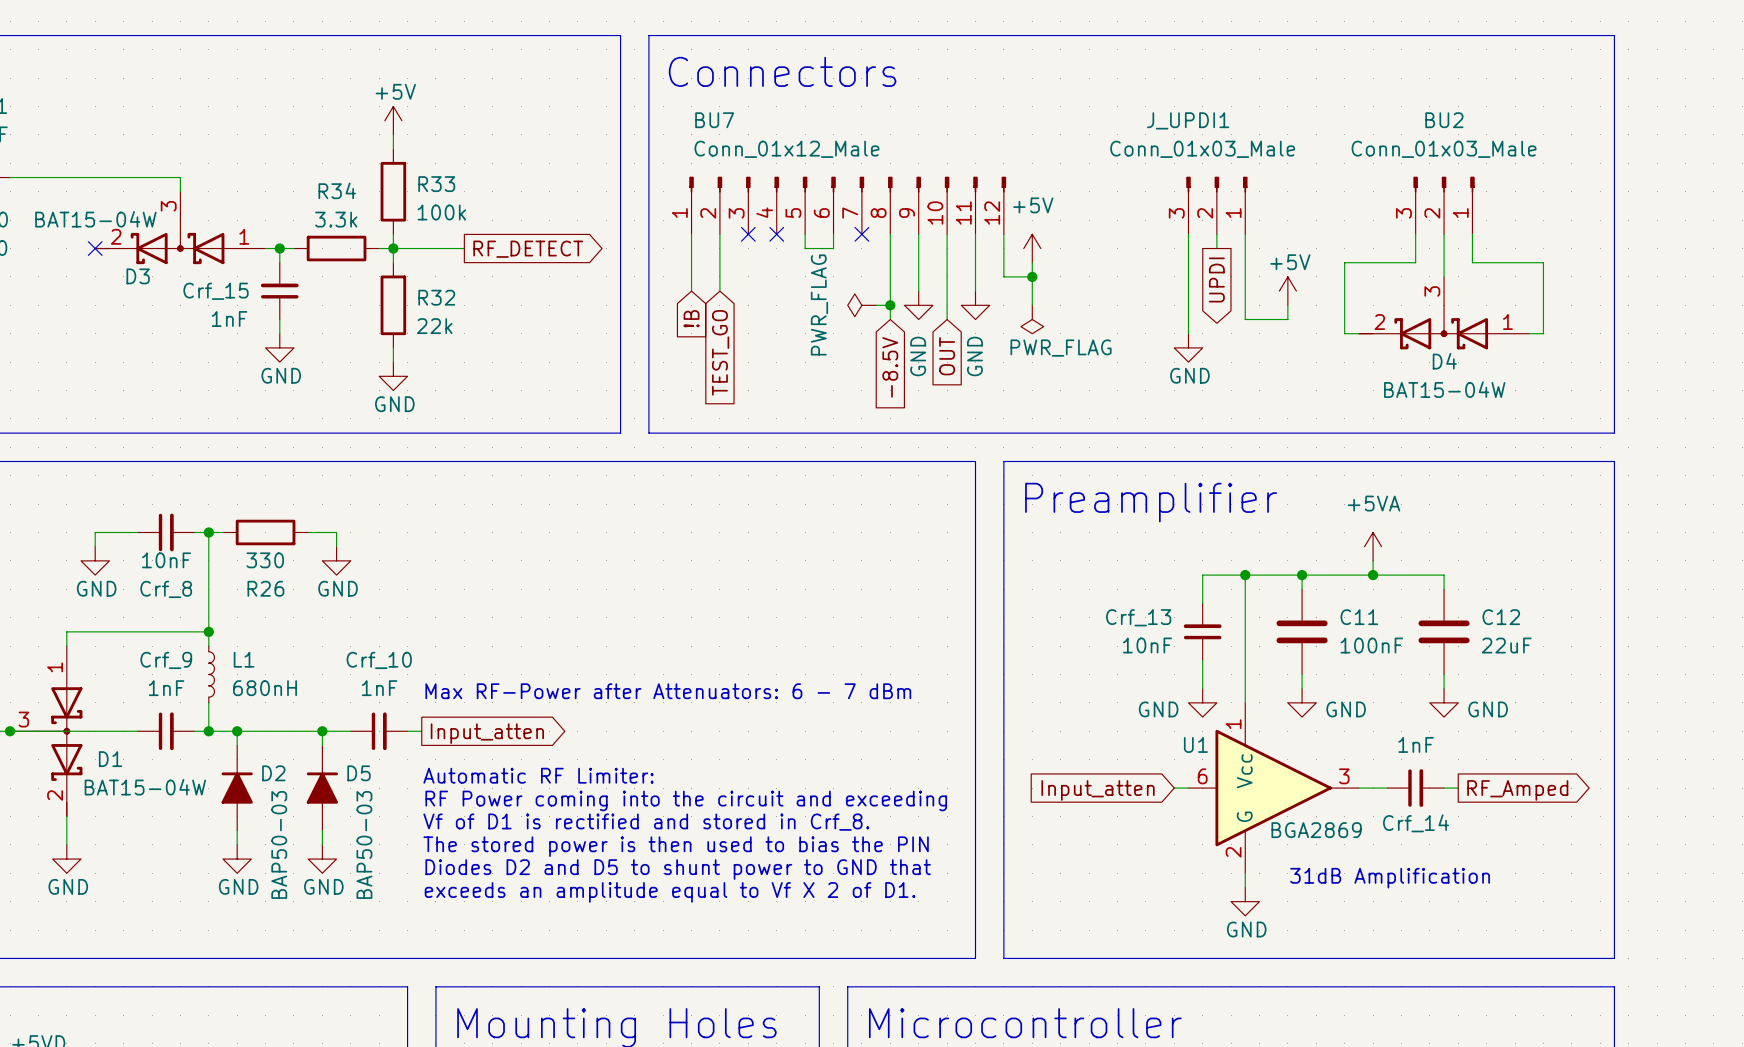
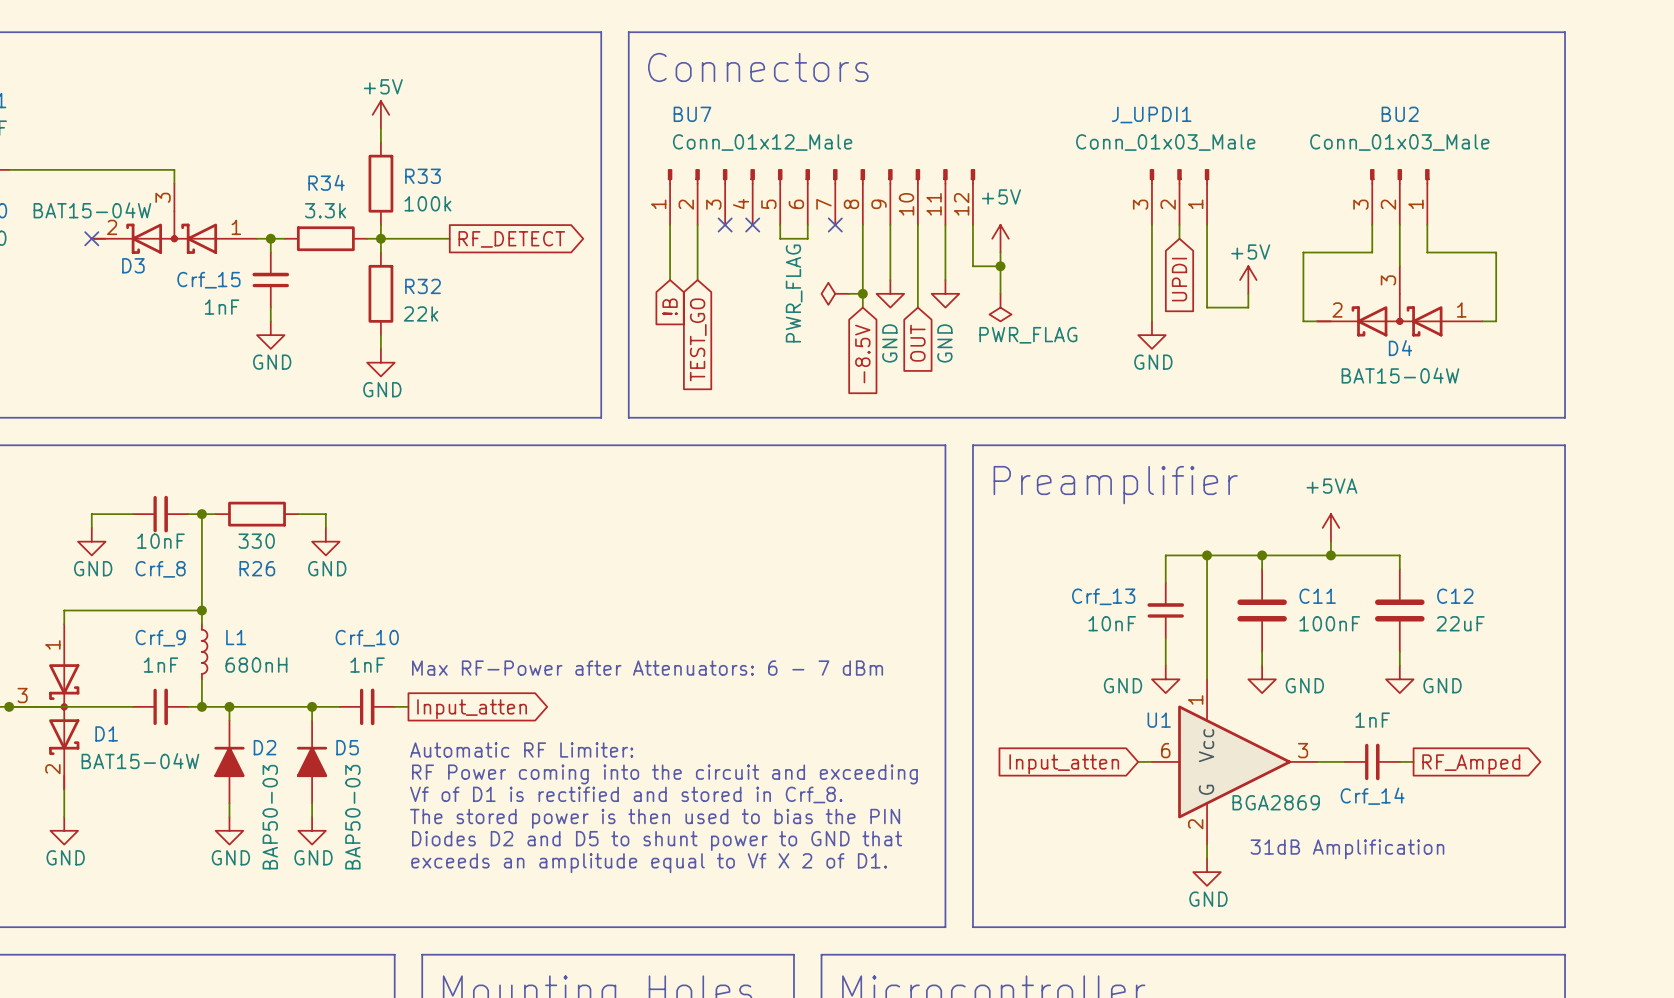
global label shape: output (1216, 279) -> input (1179, 279)

